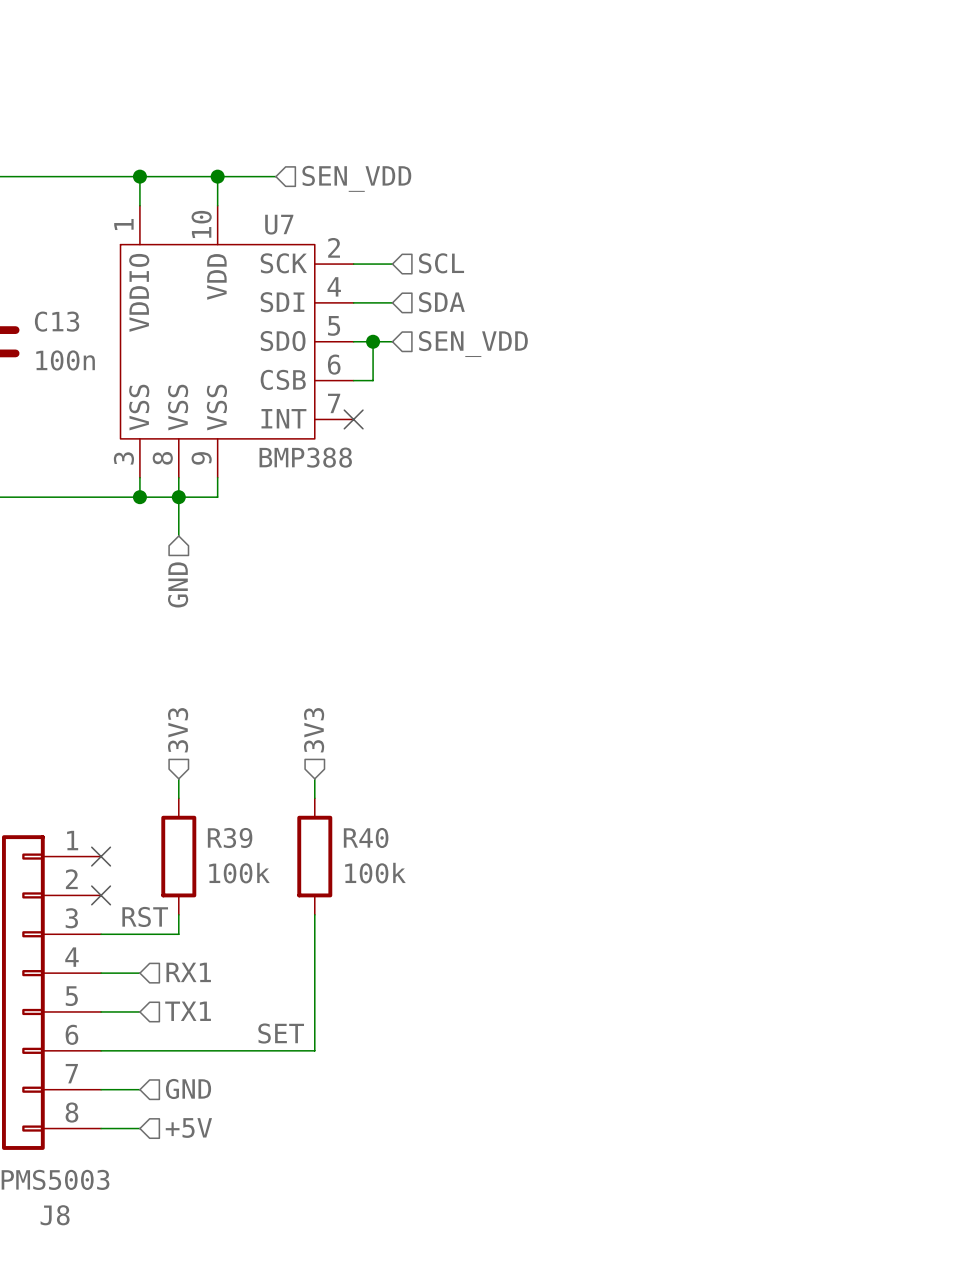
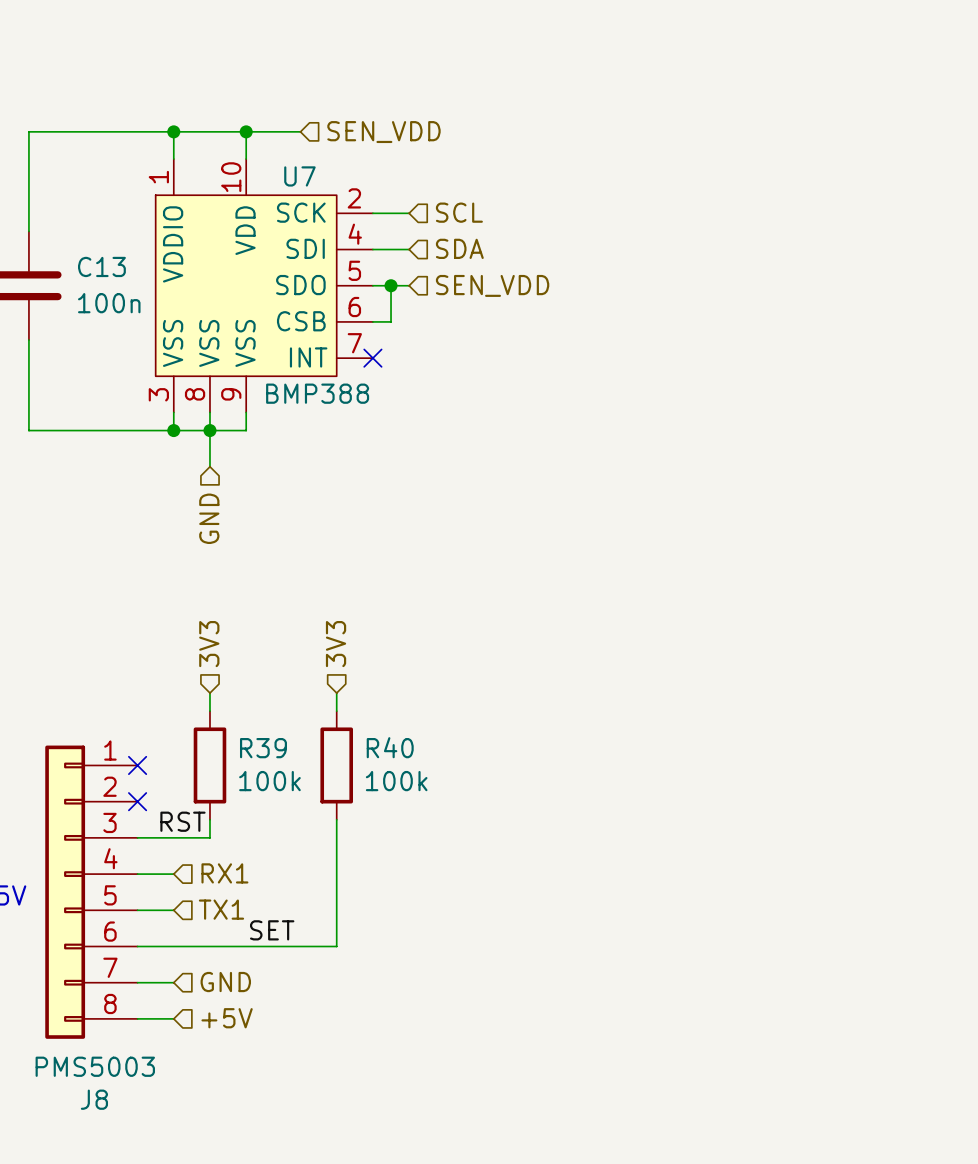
label position: SET (281, 1033) -> SET (272, 930)

